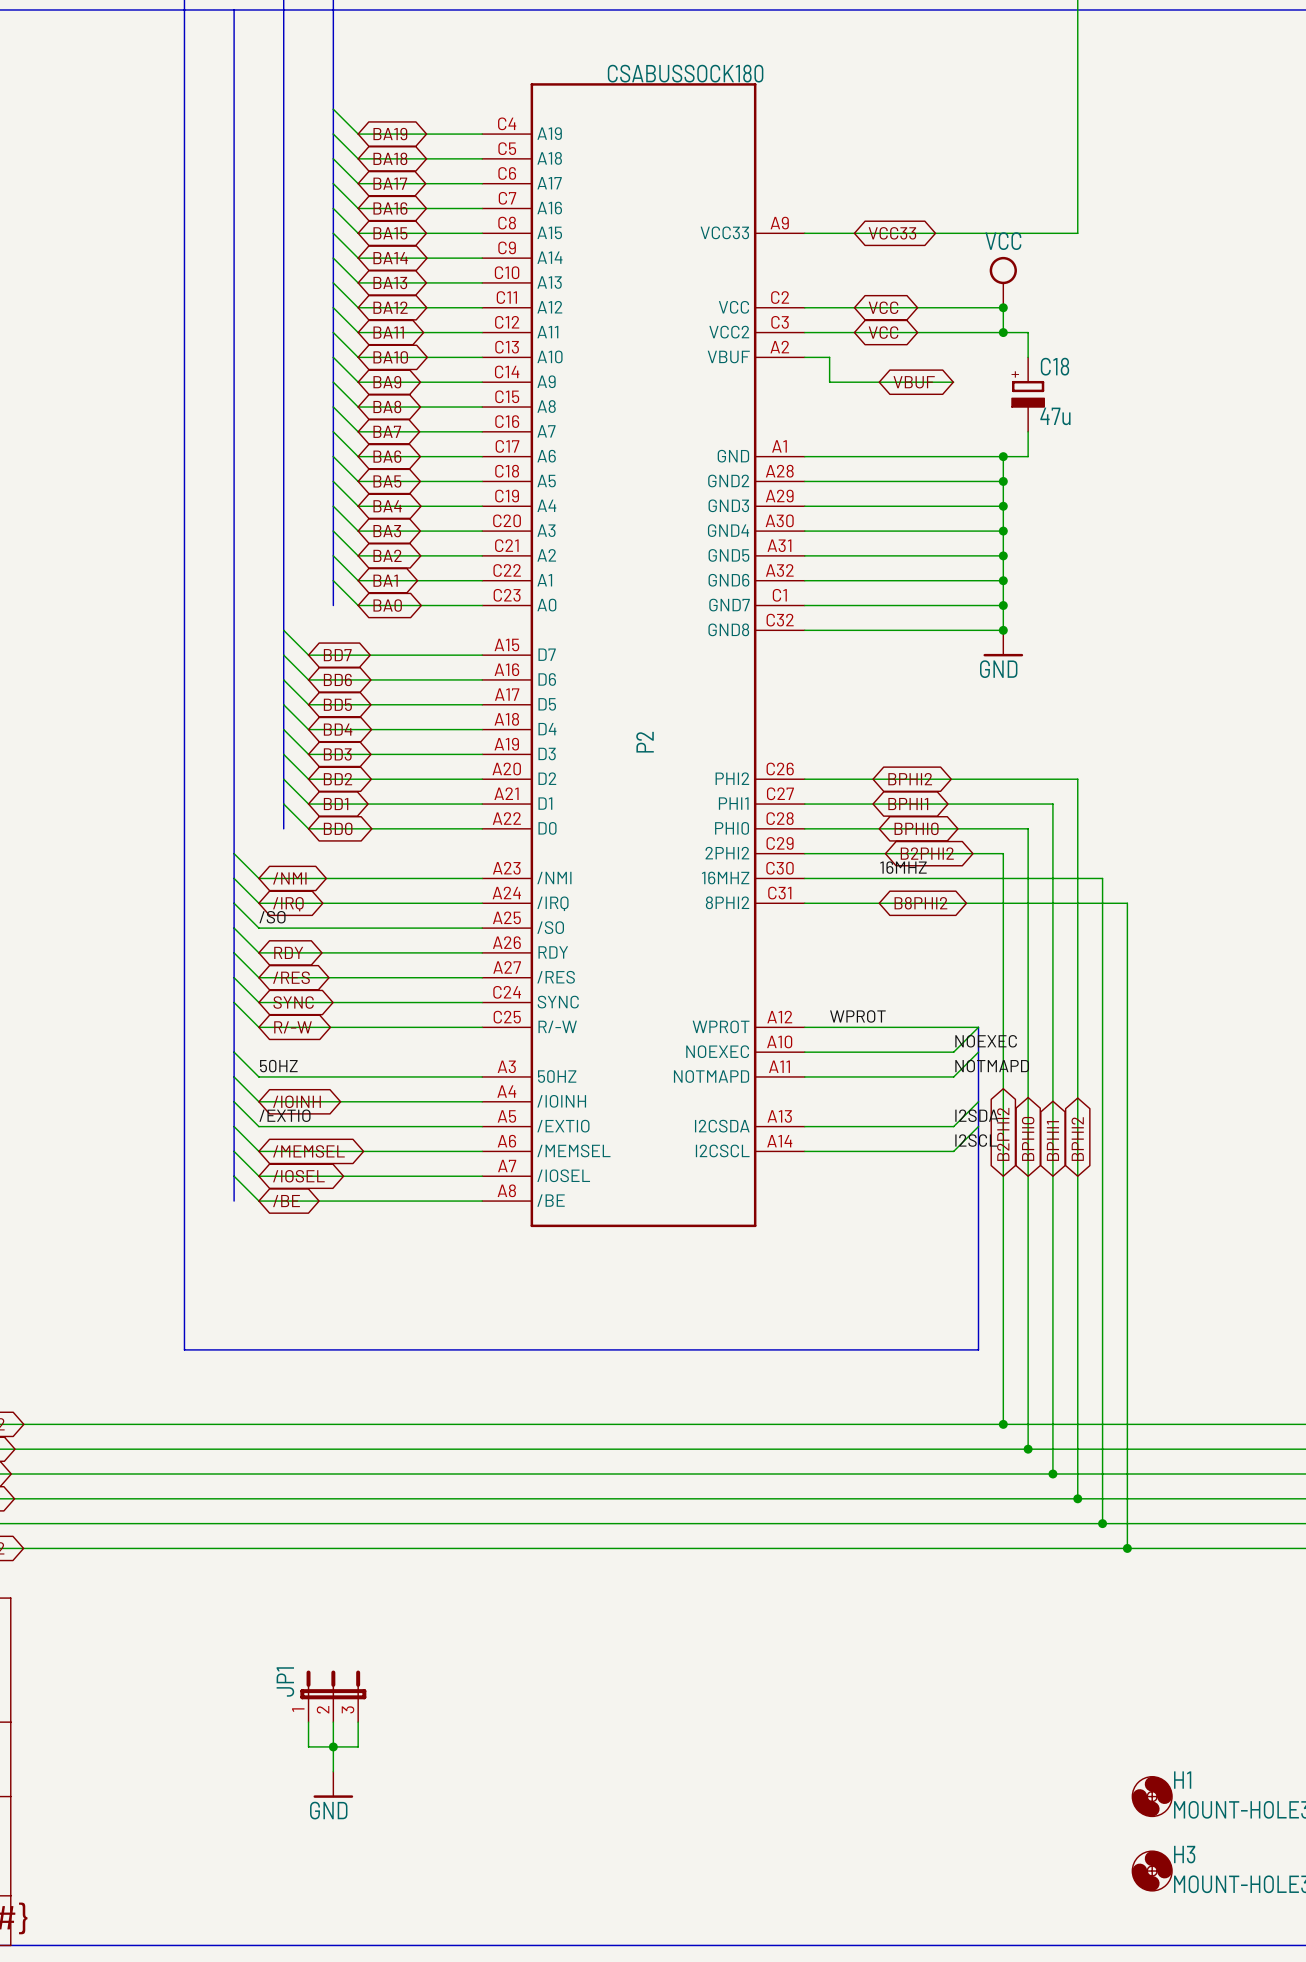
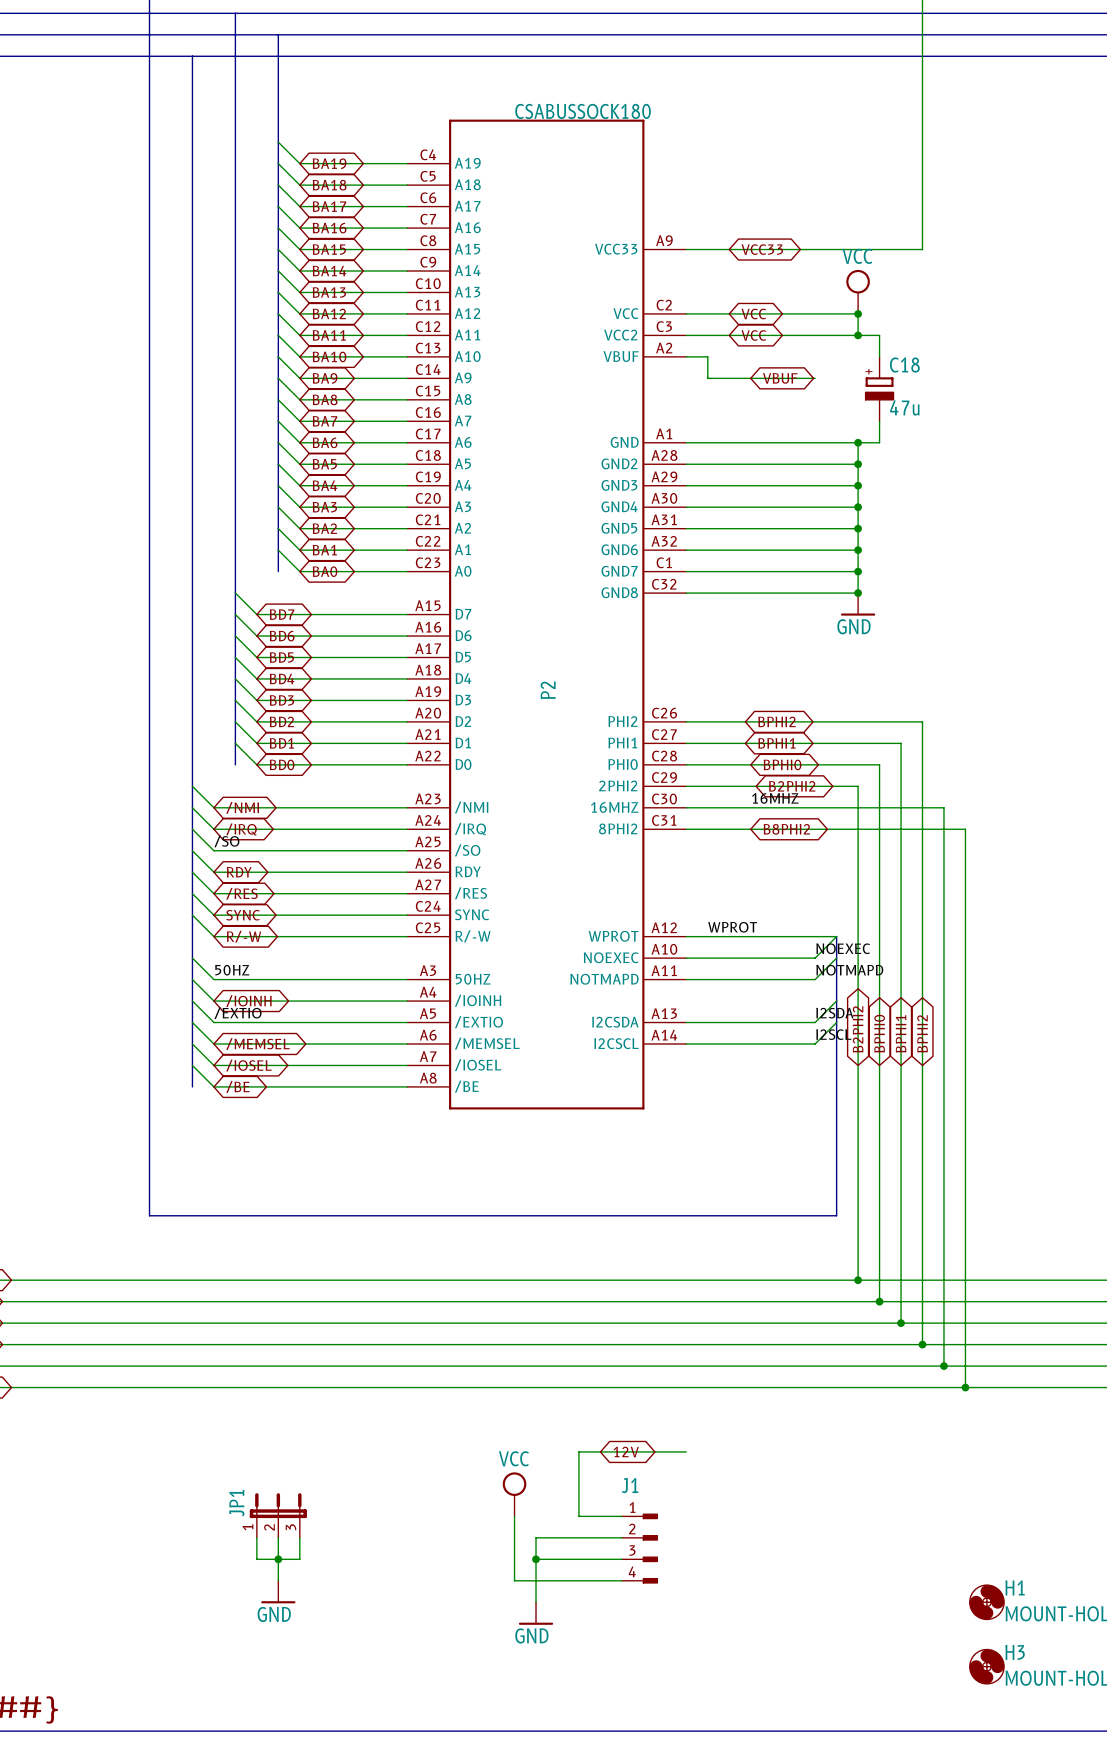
global label: none -> 12V (626, 1452)
wire: none -> (686, 1451) (578, 1451) (578, 1516) (621, 1516)
power symbol: none -> VCC (514, 1494)
wire: none -> (514, 1516) (514, 1580) (621, 1580)
wire: none -> (621, 1537) (536, 1537) (536, 1602)
J1: none -> (639, 1548)
wire: none -> (536, 1559) (621, 1559)
junction: none -> (536, 1559)
power symbol: none -> GND (536, 1613)

